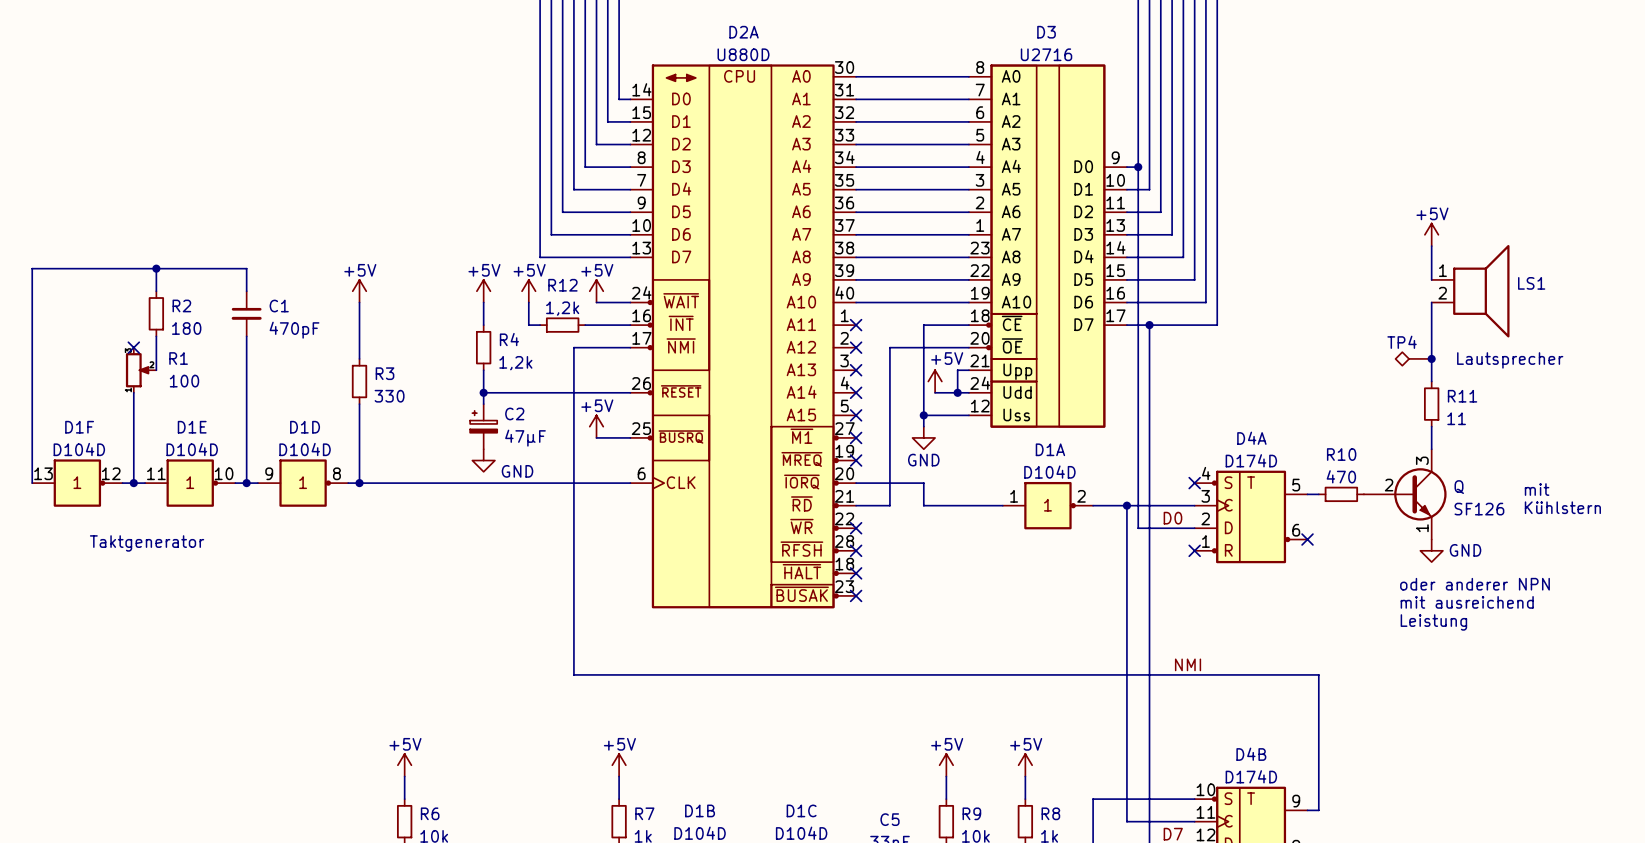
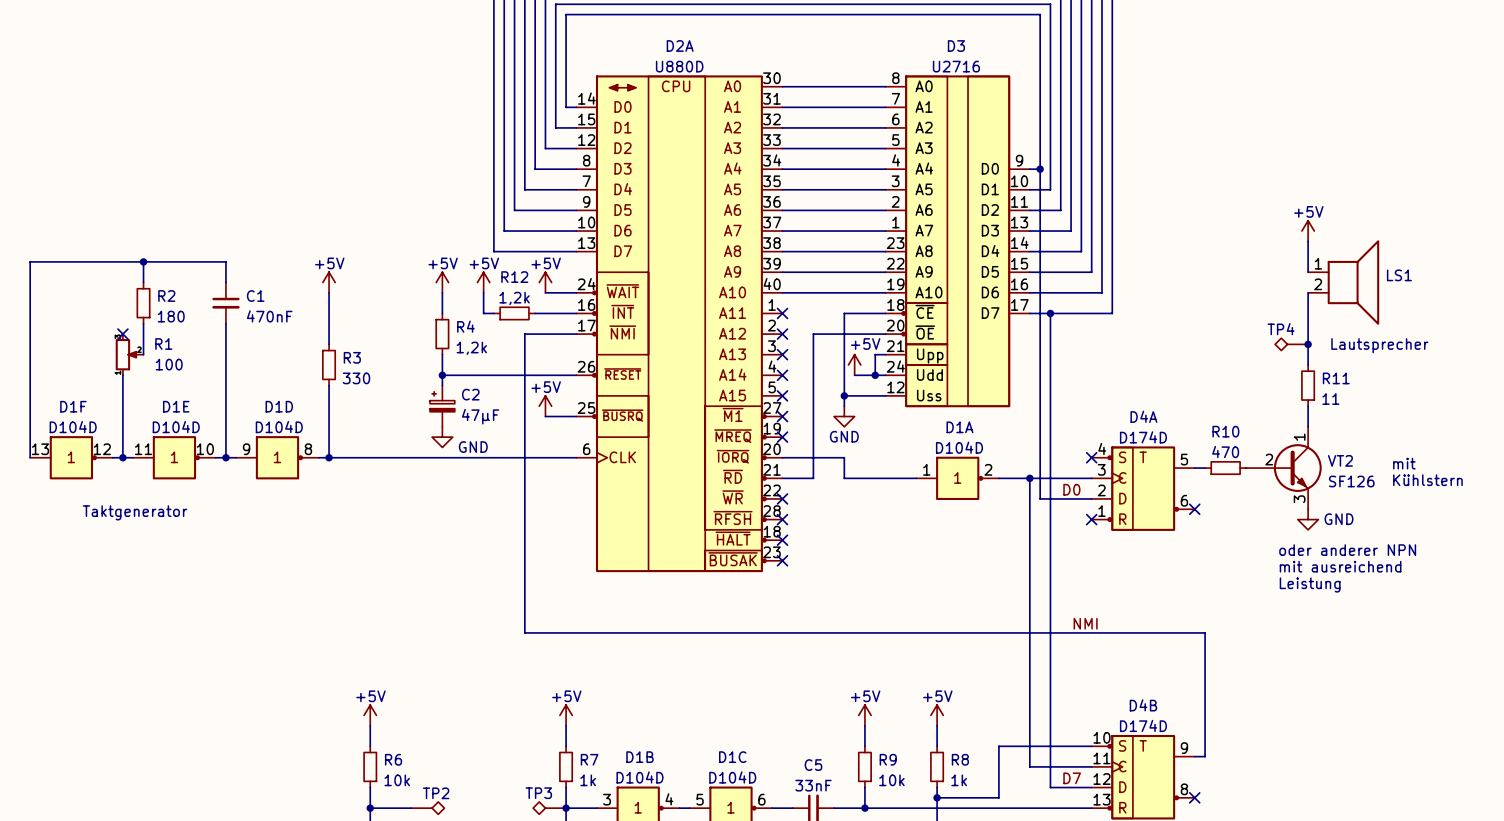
C1 value: 470pF (294, 330) -> 470nF (269, 316)
Q pin number: 3 (1422, 460) -> 1 (1299, 437)
Q name: Q (1459, 487) -> VT2 (1340, 460)
Q pin number: 1 (1422, 528) -> 3 (1299, 499)

